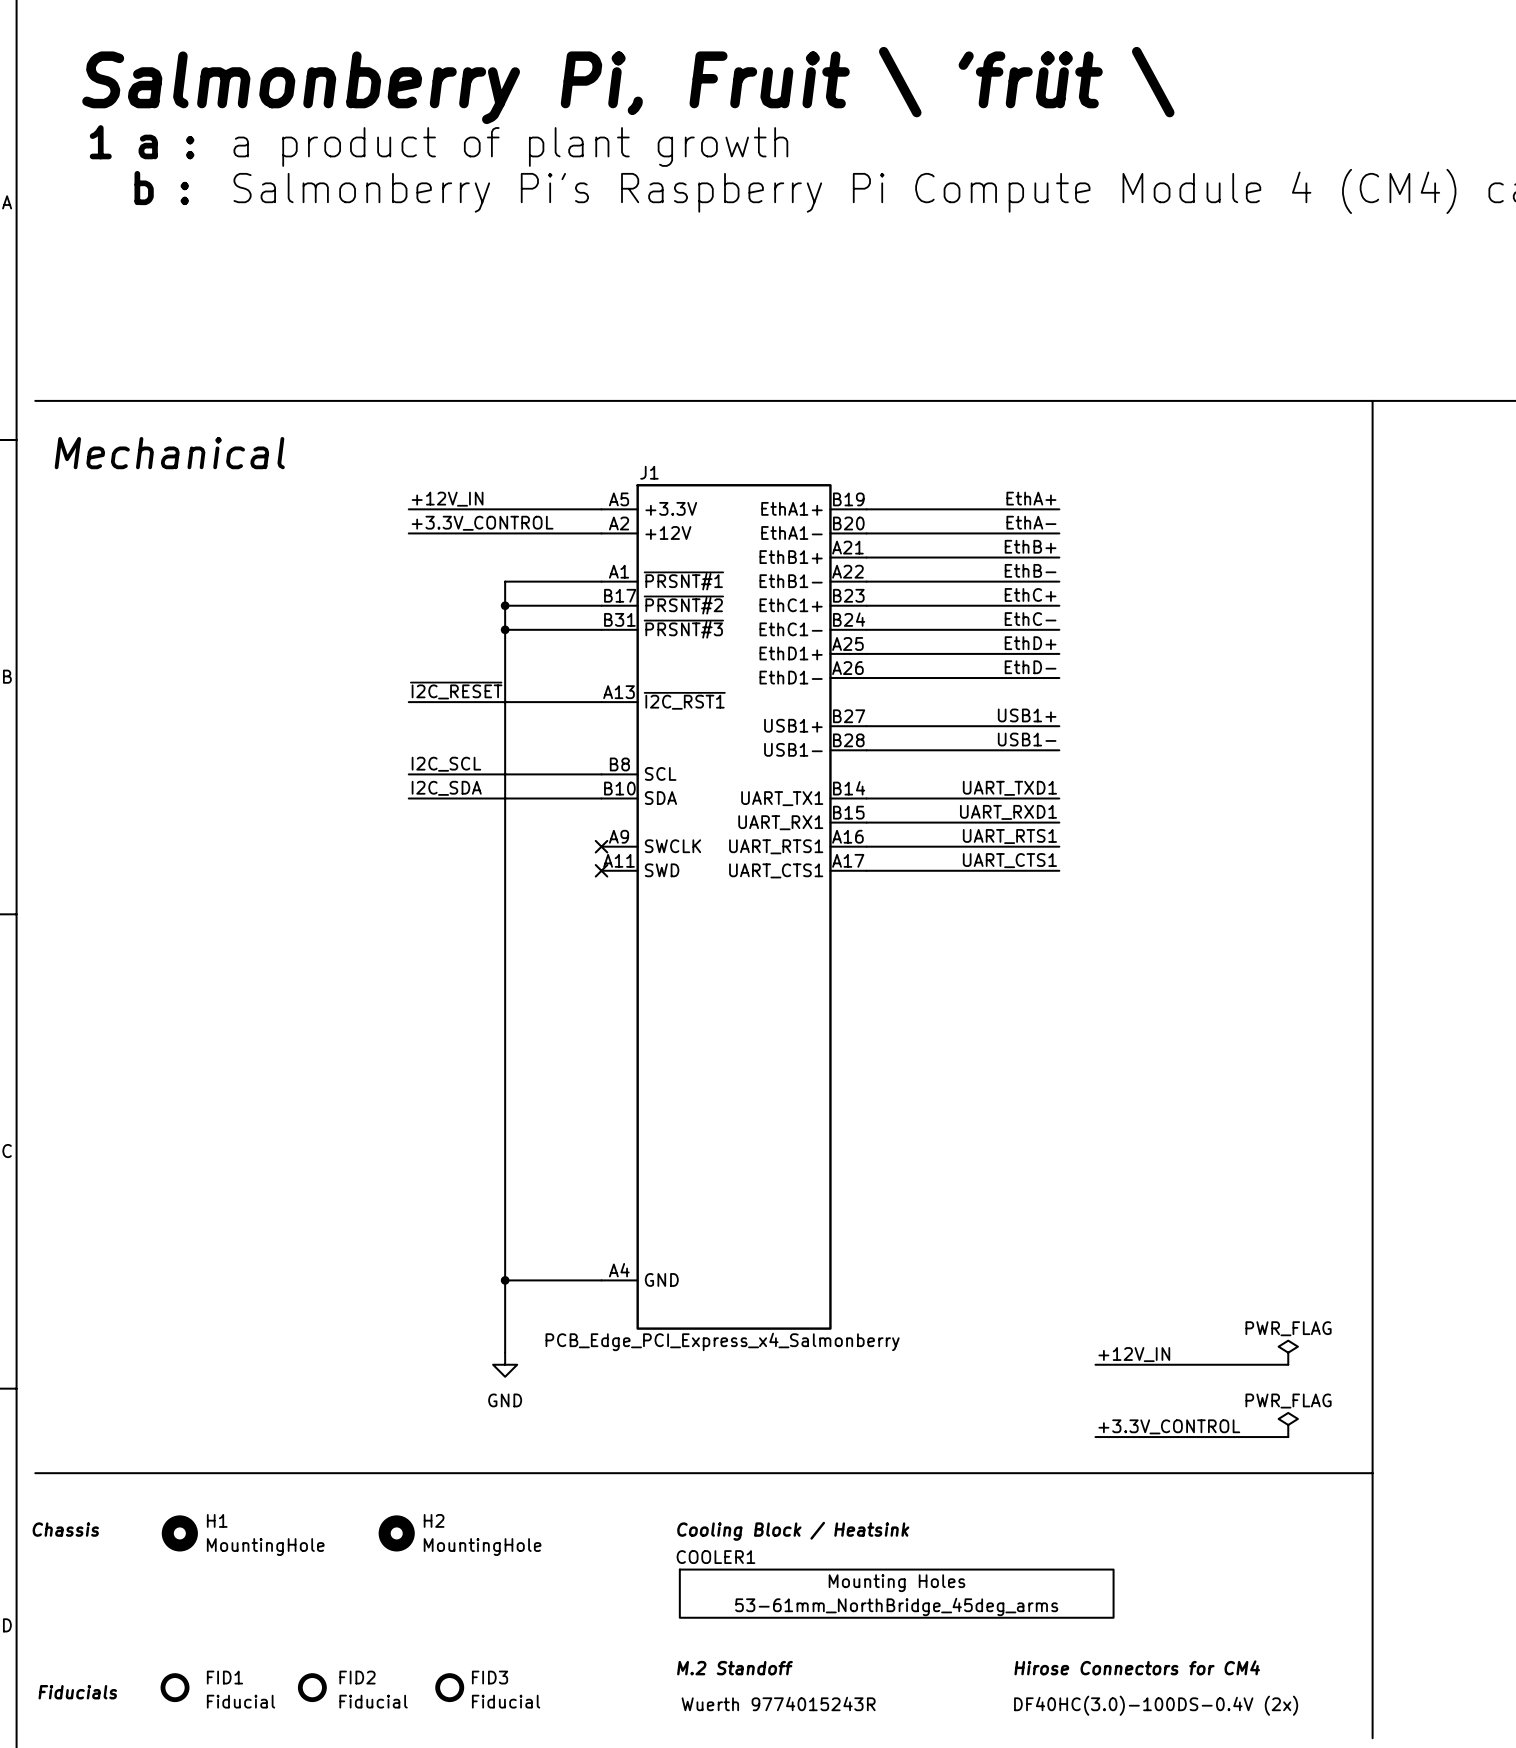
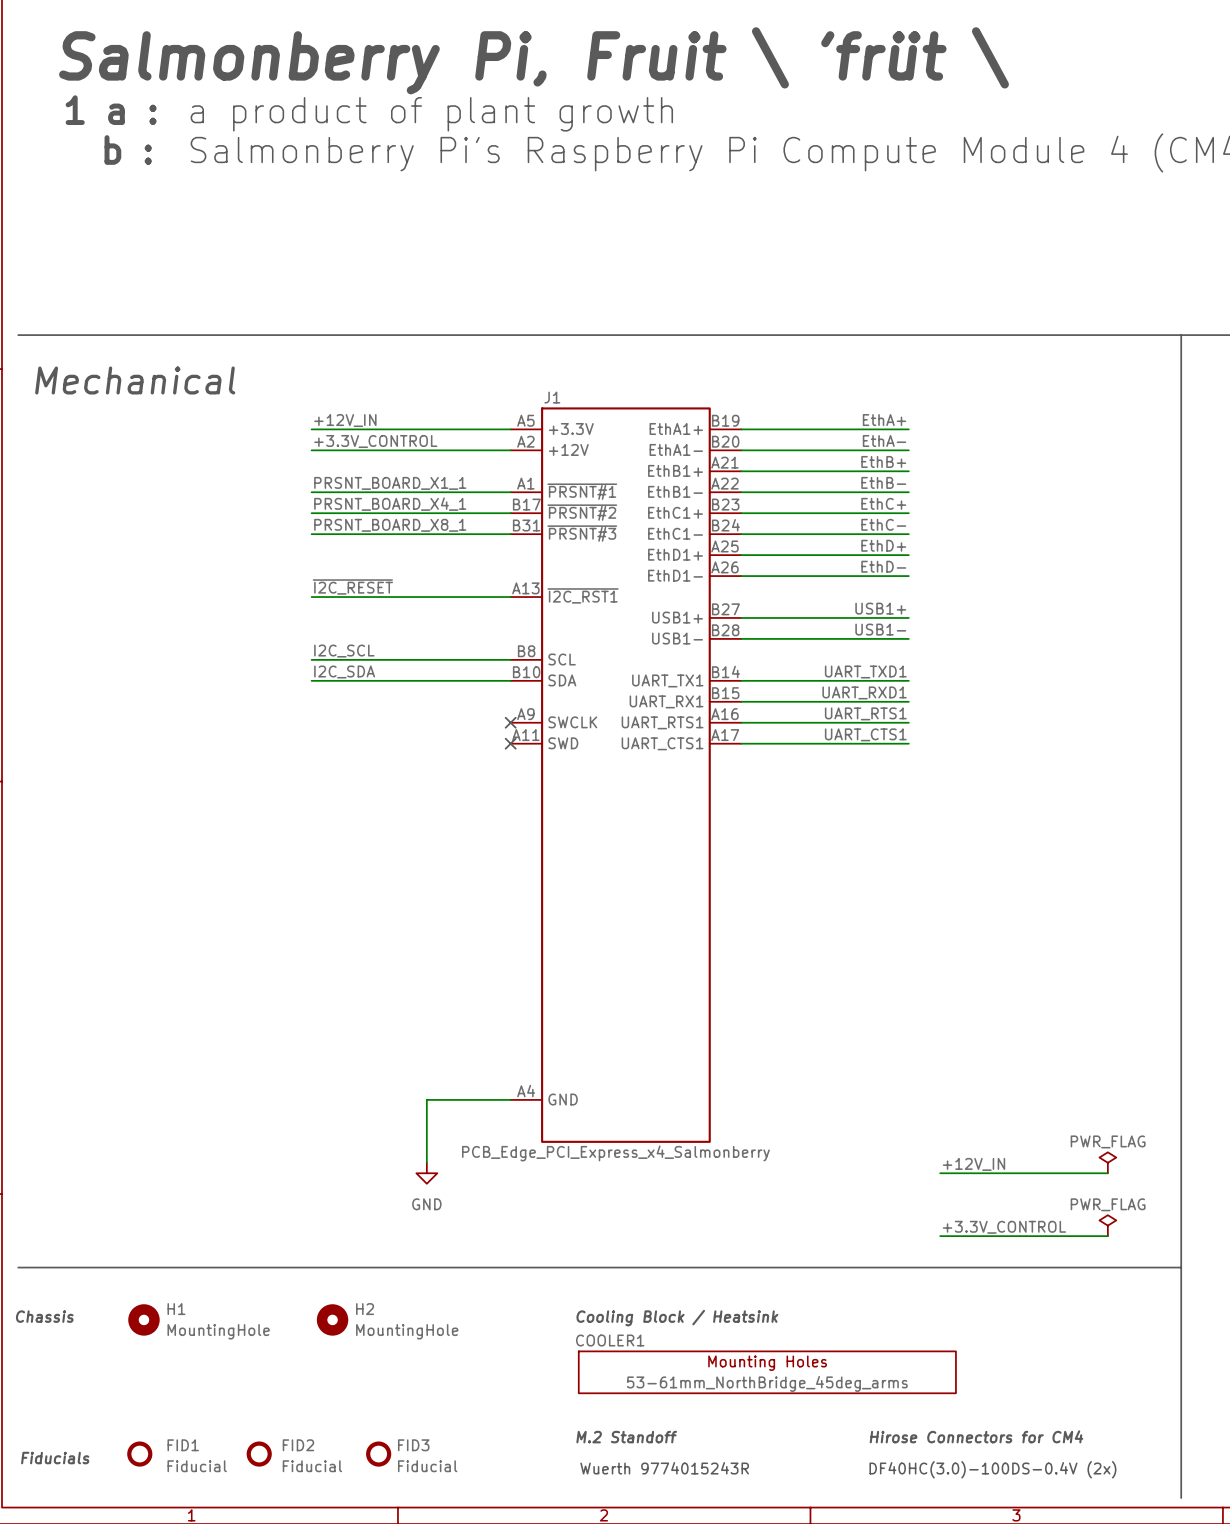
label position: +12V_IN (447, 499) -> +12V_IN (345, 420)
wire: none -> (311, 429) (343, 429)
label position: +3.3V_CONTROL (482, 523) -> +3.3V_CONTROL (375, 441)
wire: none -> (311, 450) (343, 450)
label: none -> PRSNT_BOARD_X1_1 (390, 483)
wire: (505, 581) (505, 1280) -> (426, 492) (311, 492)
label: none -> PRSNT_BOARD_X4_1 (390, 504)
wire: none -> (311, 513) (426, 513)
junction: (505, 605) -> none
label: none -> PRSNT_BOARD_X8_1 (390, 525)
wire: none -> (311, 534) (426, 534)
junction: (505, 629) -> none
label position: ~{I2C_RESET} (456, 690) -> ~{I2C_RESET} (352, 586)
wire: none -> (311, 597) (343, 597)
label position: I2C_SCL (446, 764) -> I2C_SCL (344, 651)
wire: none -> (311, 659) (343, 659)
label position: I2C_SDA (446, 788) -> I2C_SDA (344, 671)
wire: none -> (311, 680) (343, 680)
junction: (505, 1280) -> none

